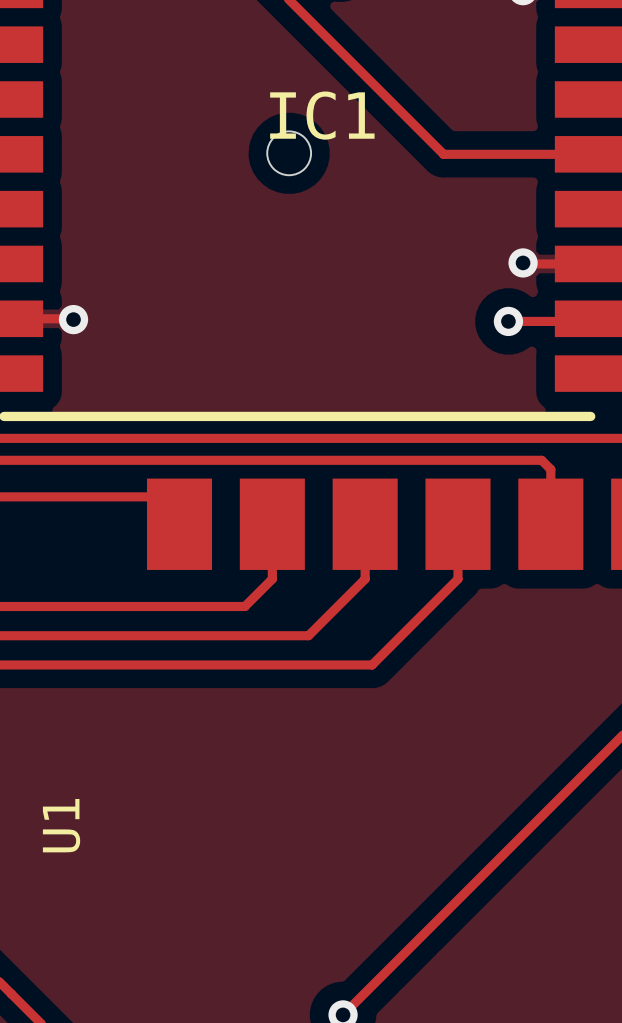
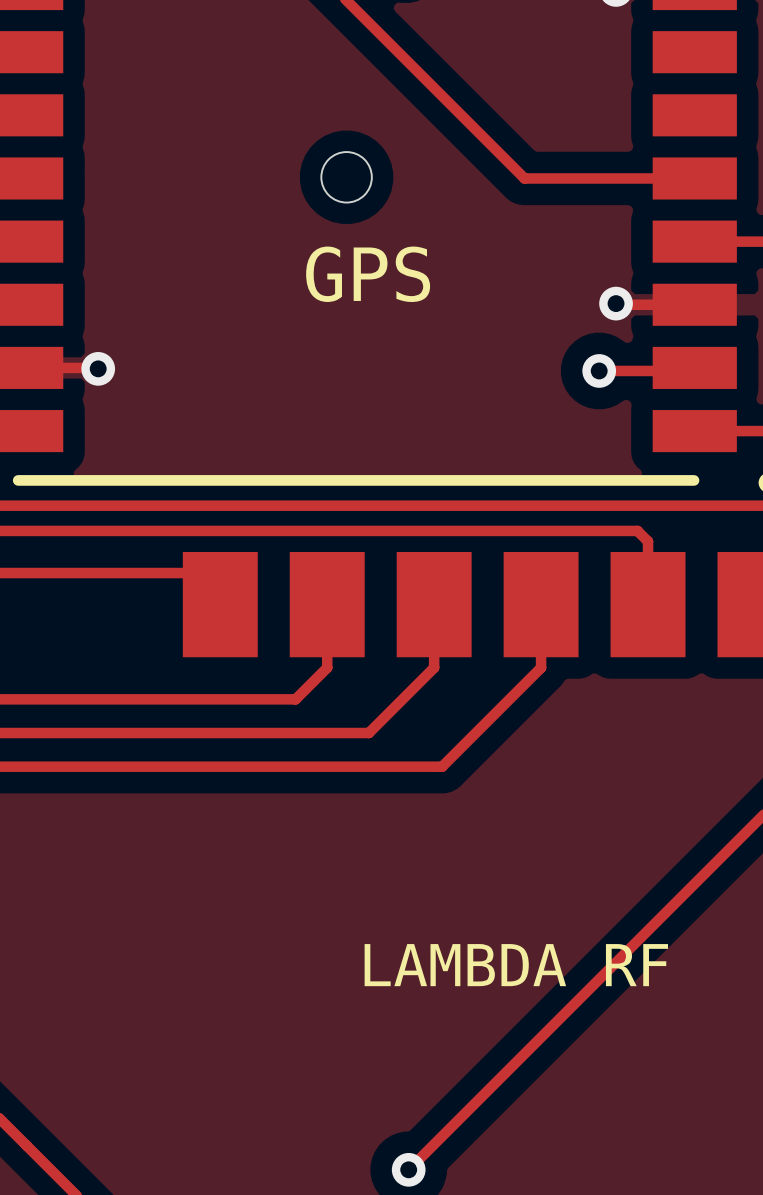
IC1 name: IC1 (322, 115) -> GPS (368, 274)
U1 name: U1 (61, 825) -> LAMBDA RF (516, 965)

